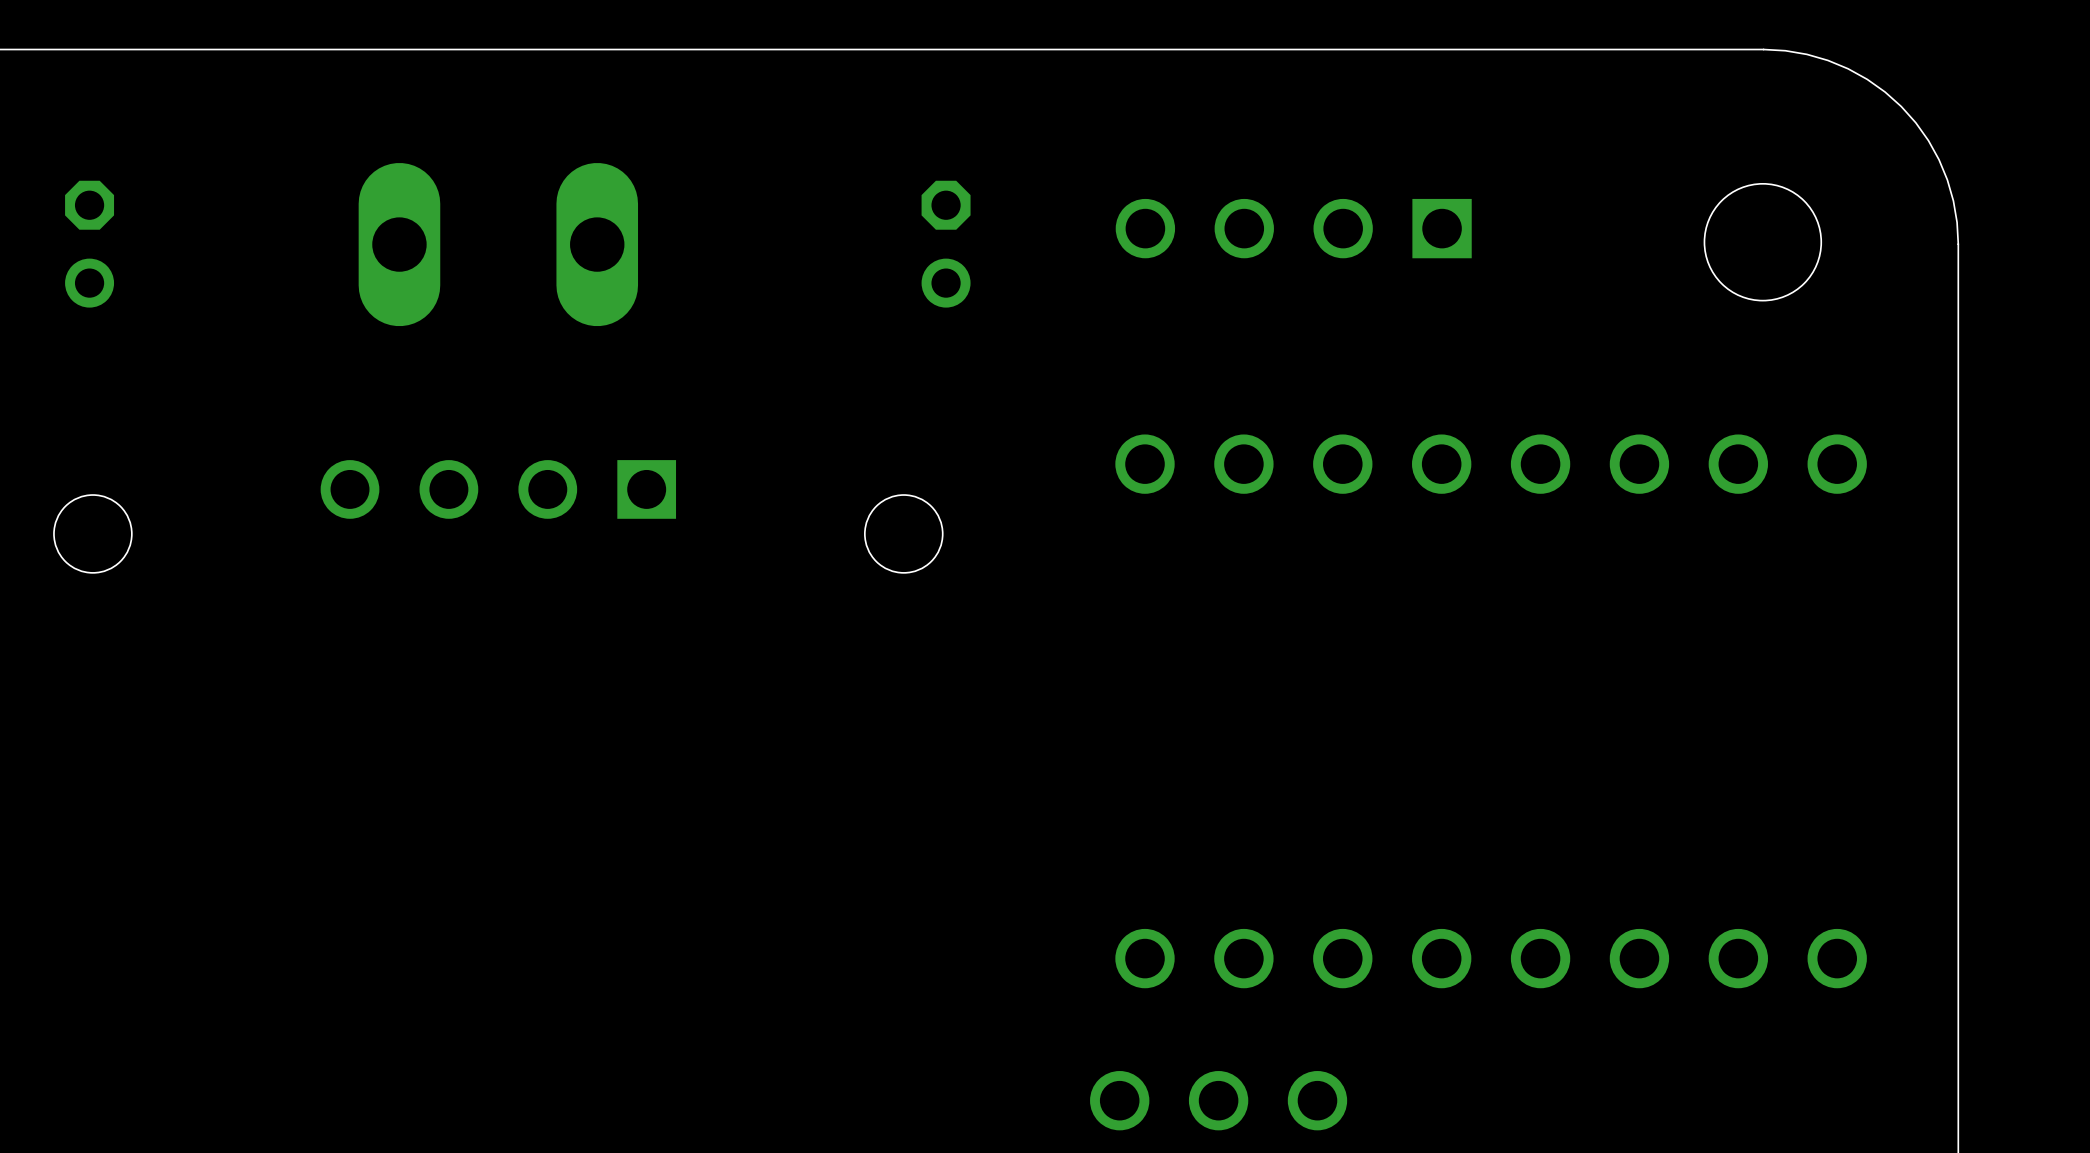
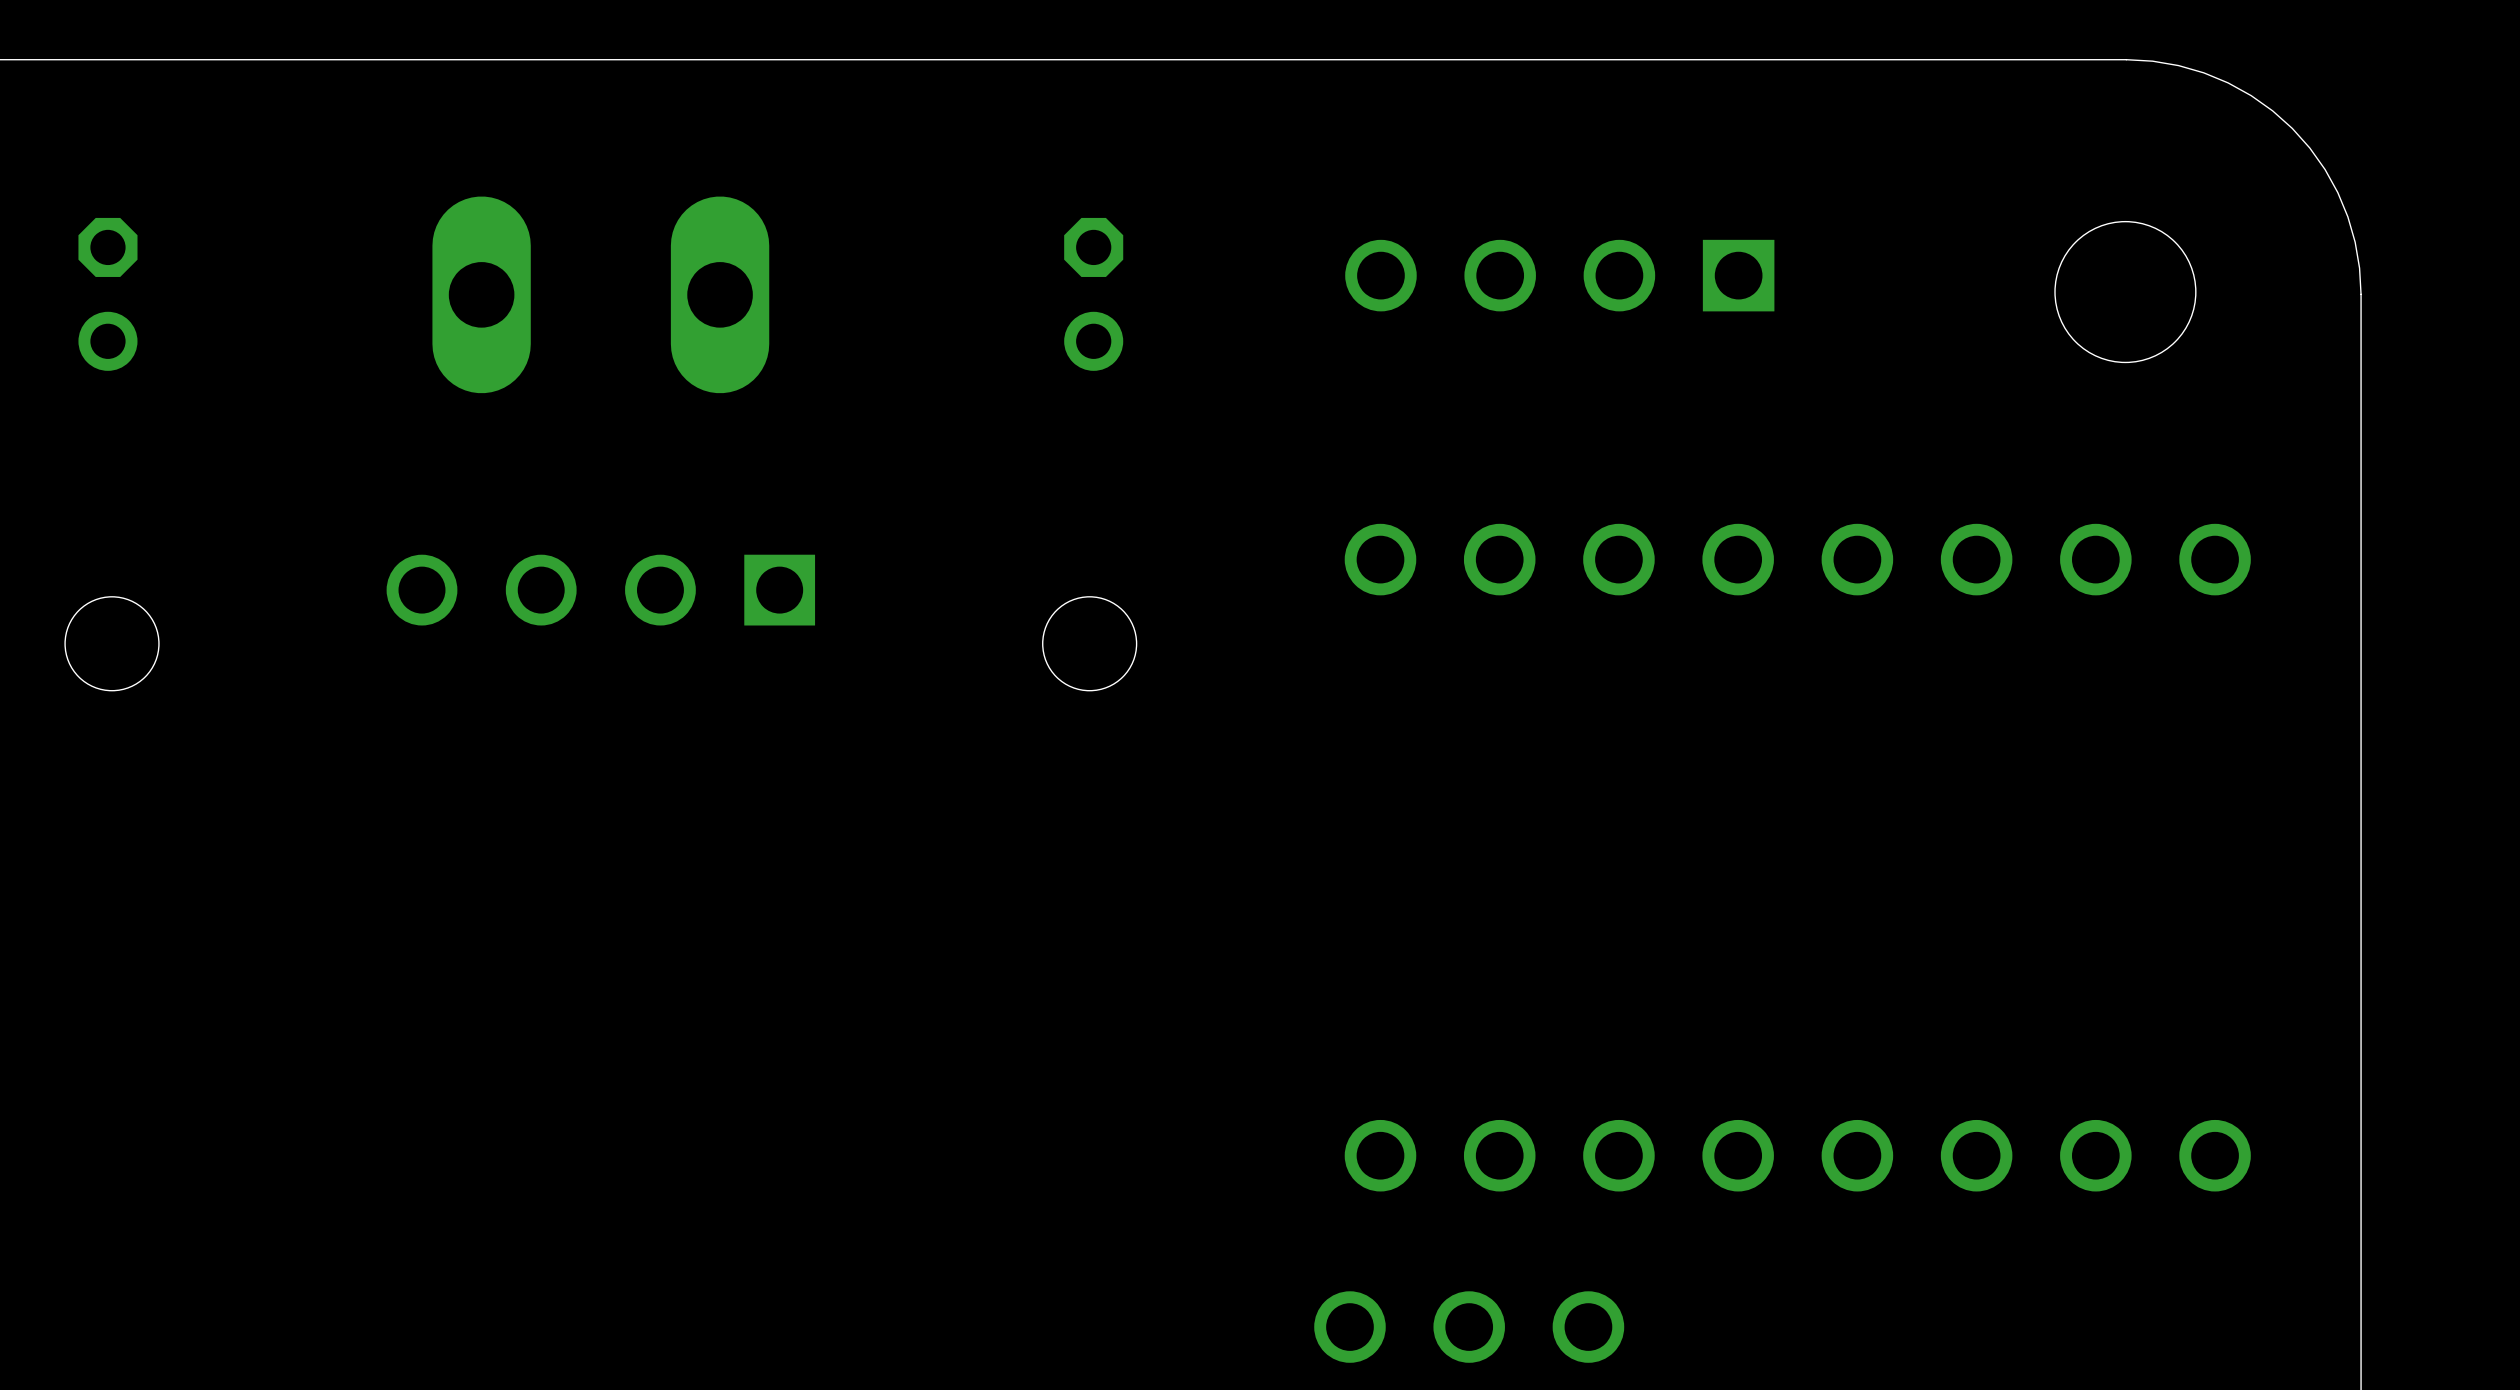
part position: (946, 244) -> (1093, 294)

